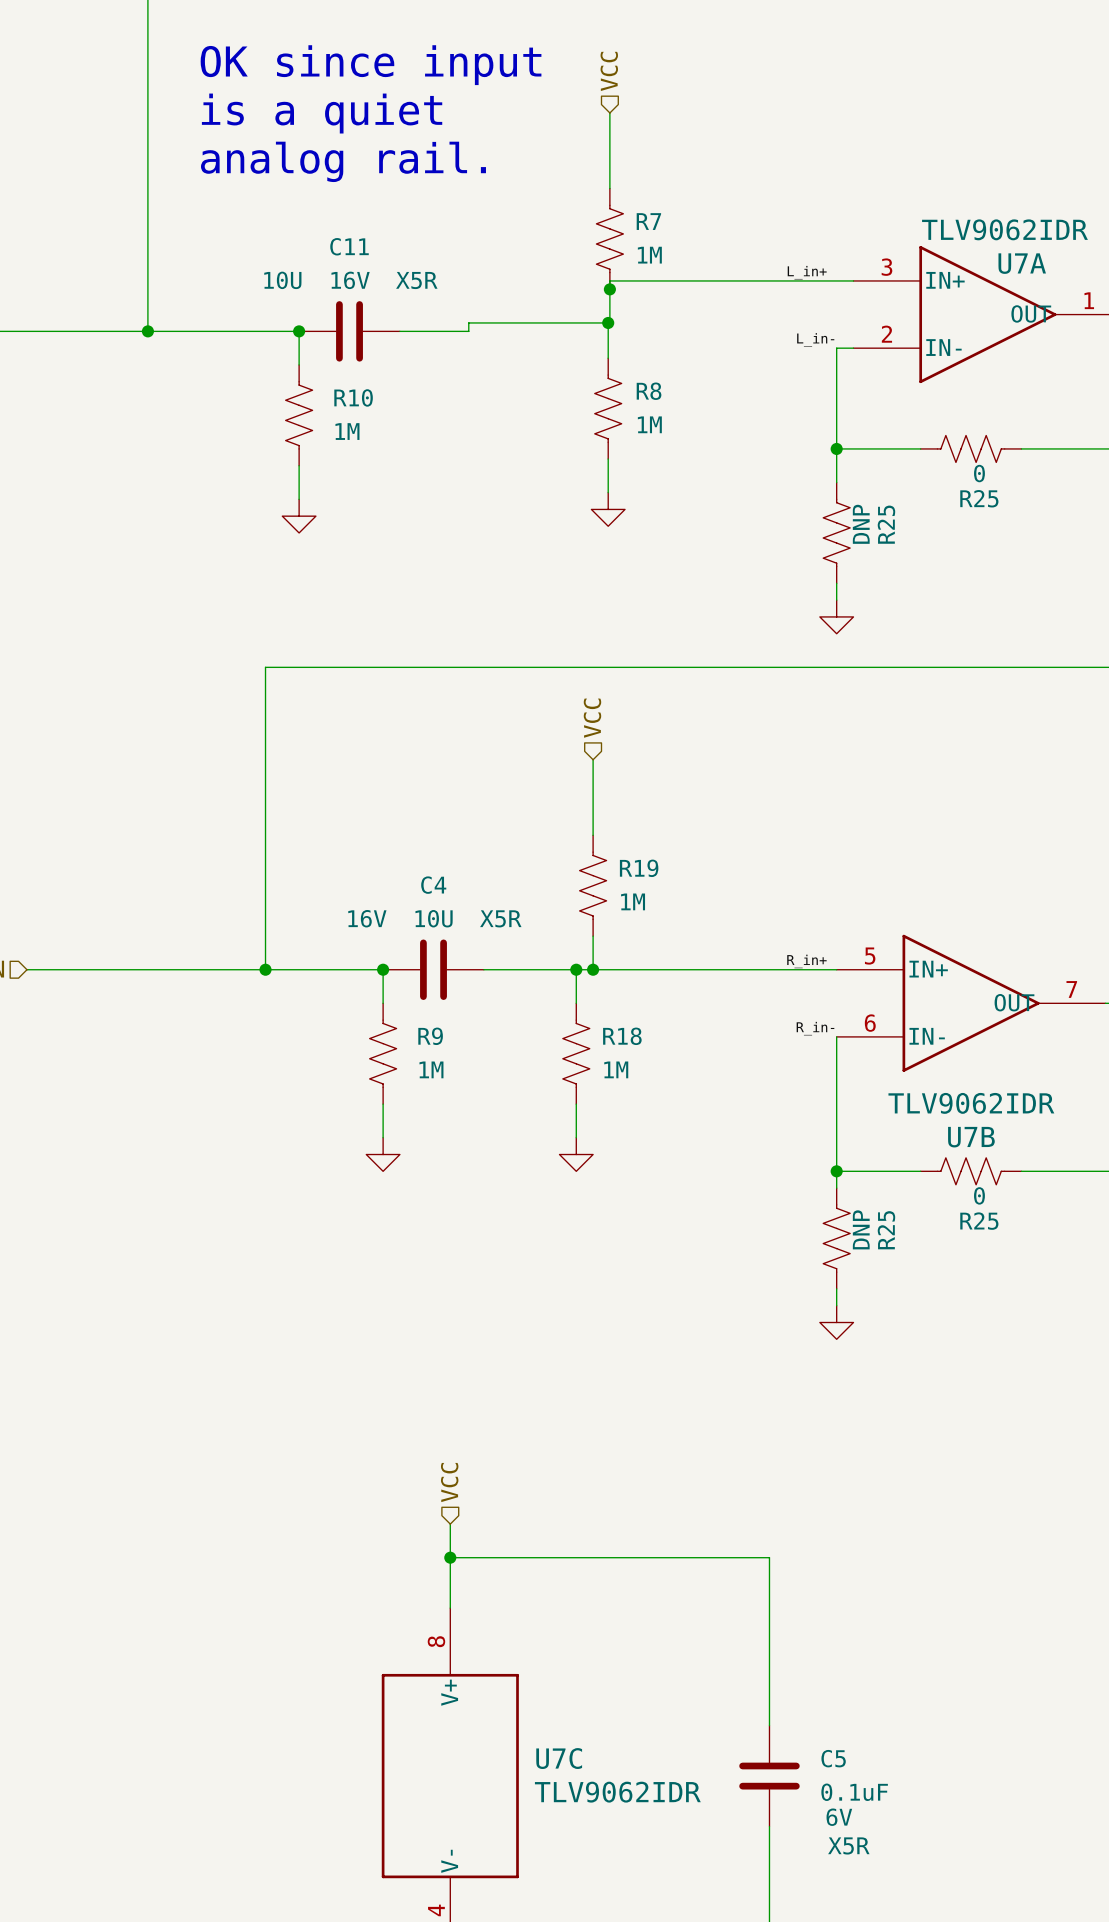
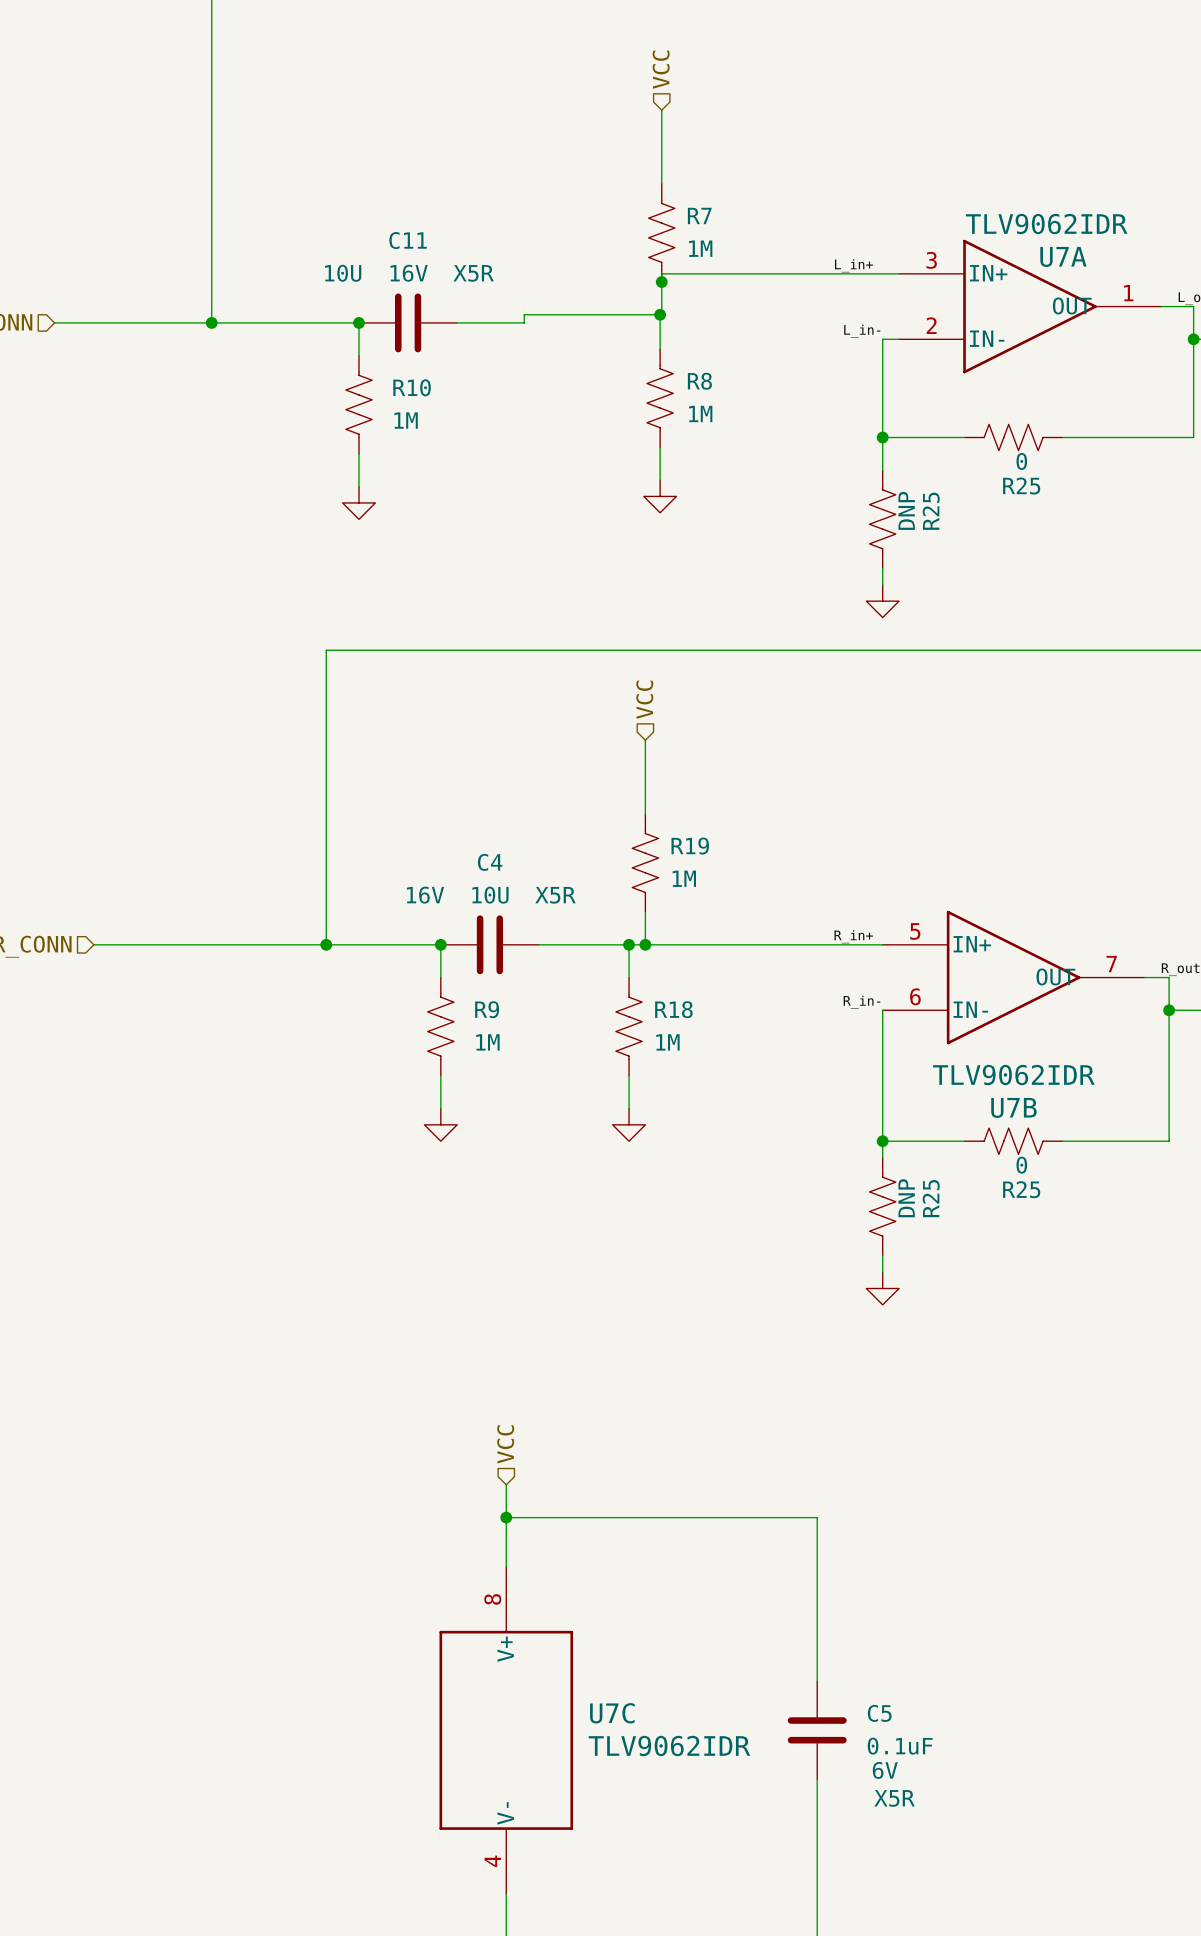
text: OK since input (371, 65) -> none
text: is a quiet (322, 113) -> none
text: analog rail. (343, 161) -> none

